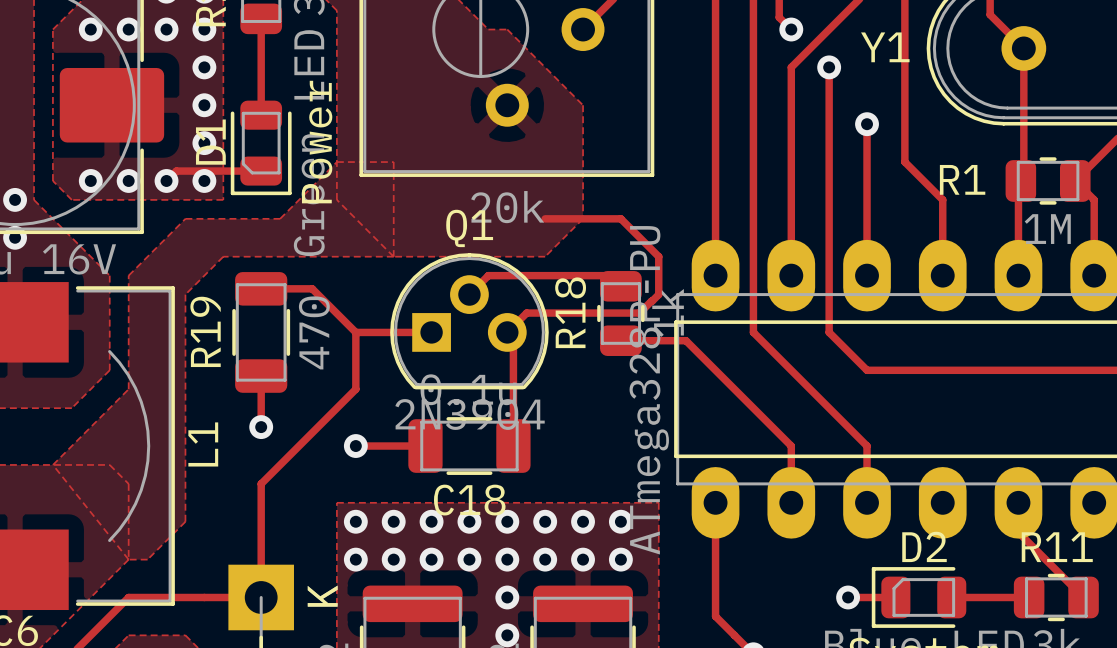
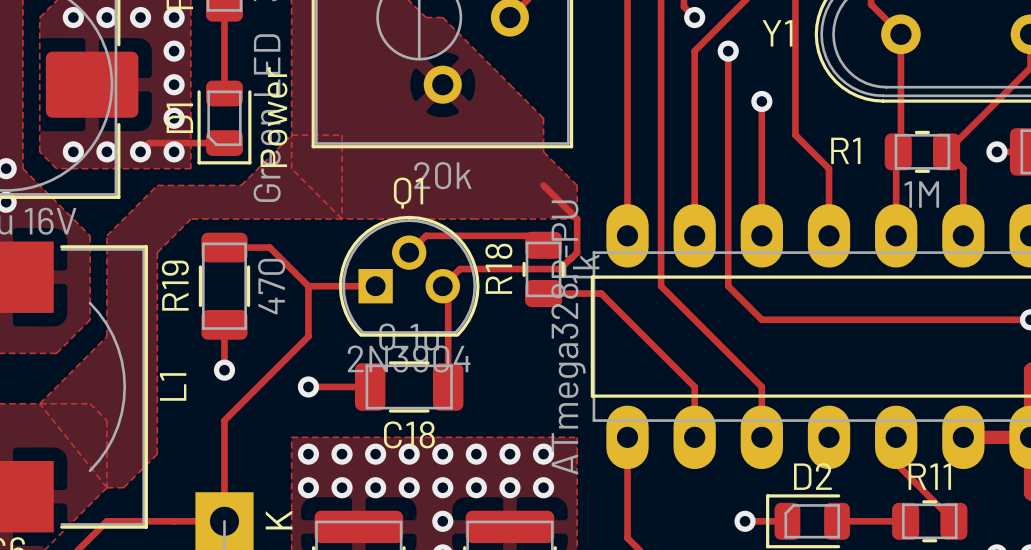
zone outline: (583, 105) (583, 218) (545, 256) -> (509, 84) (543, 118) (543, 151) (577, 185) (577, 219) (476, 219)
track: (545, 218) (620, 218) -> none

